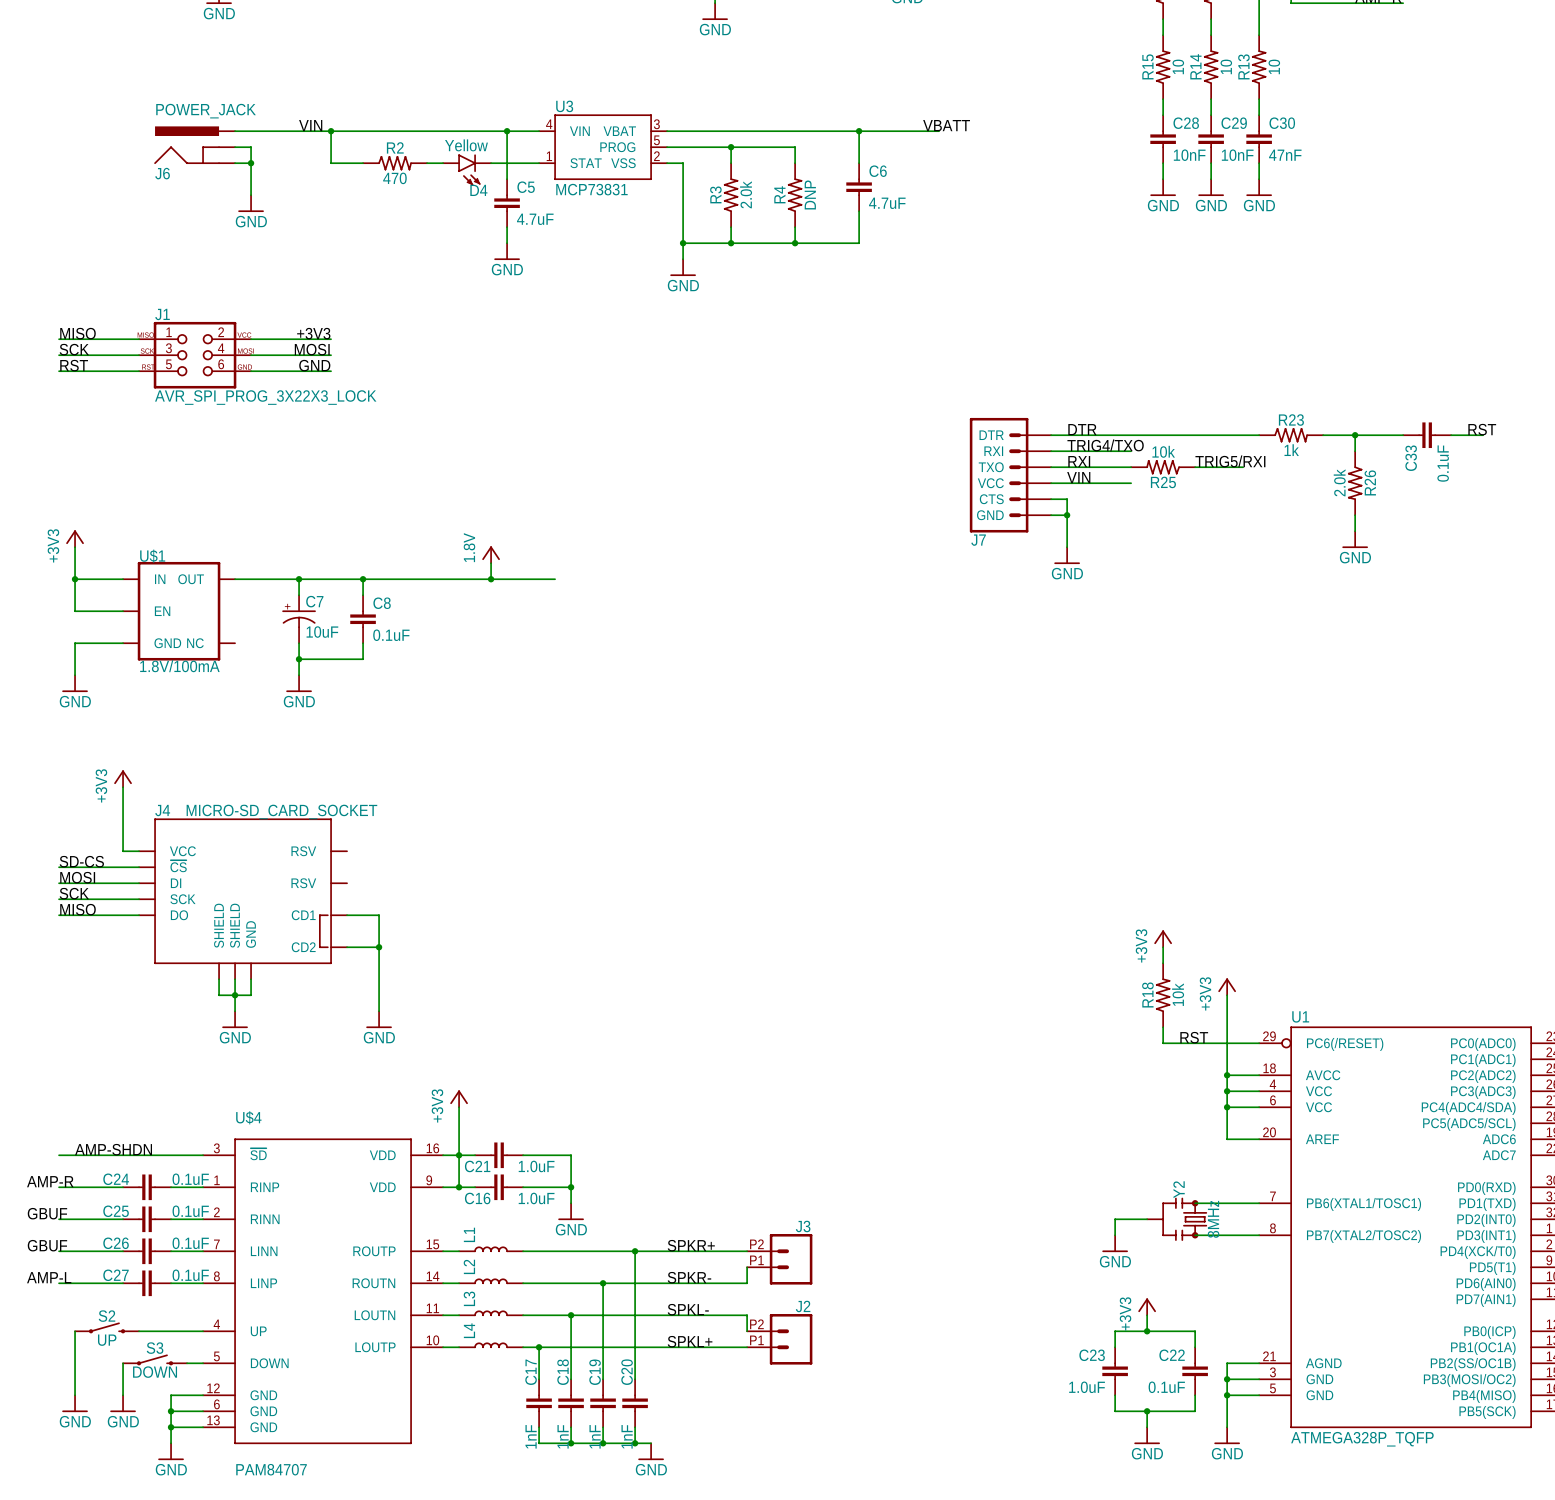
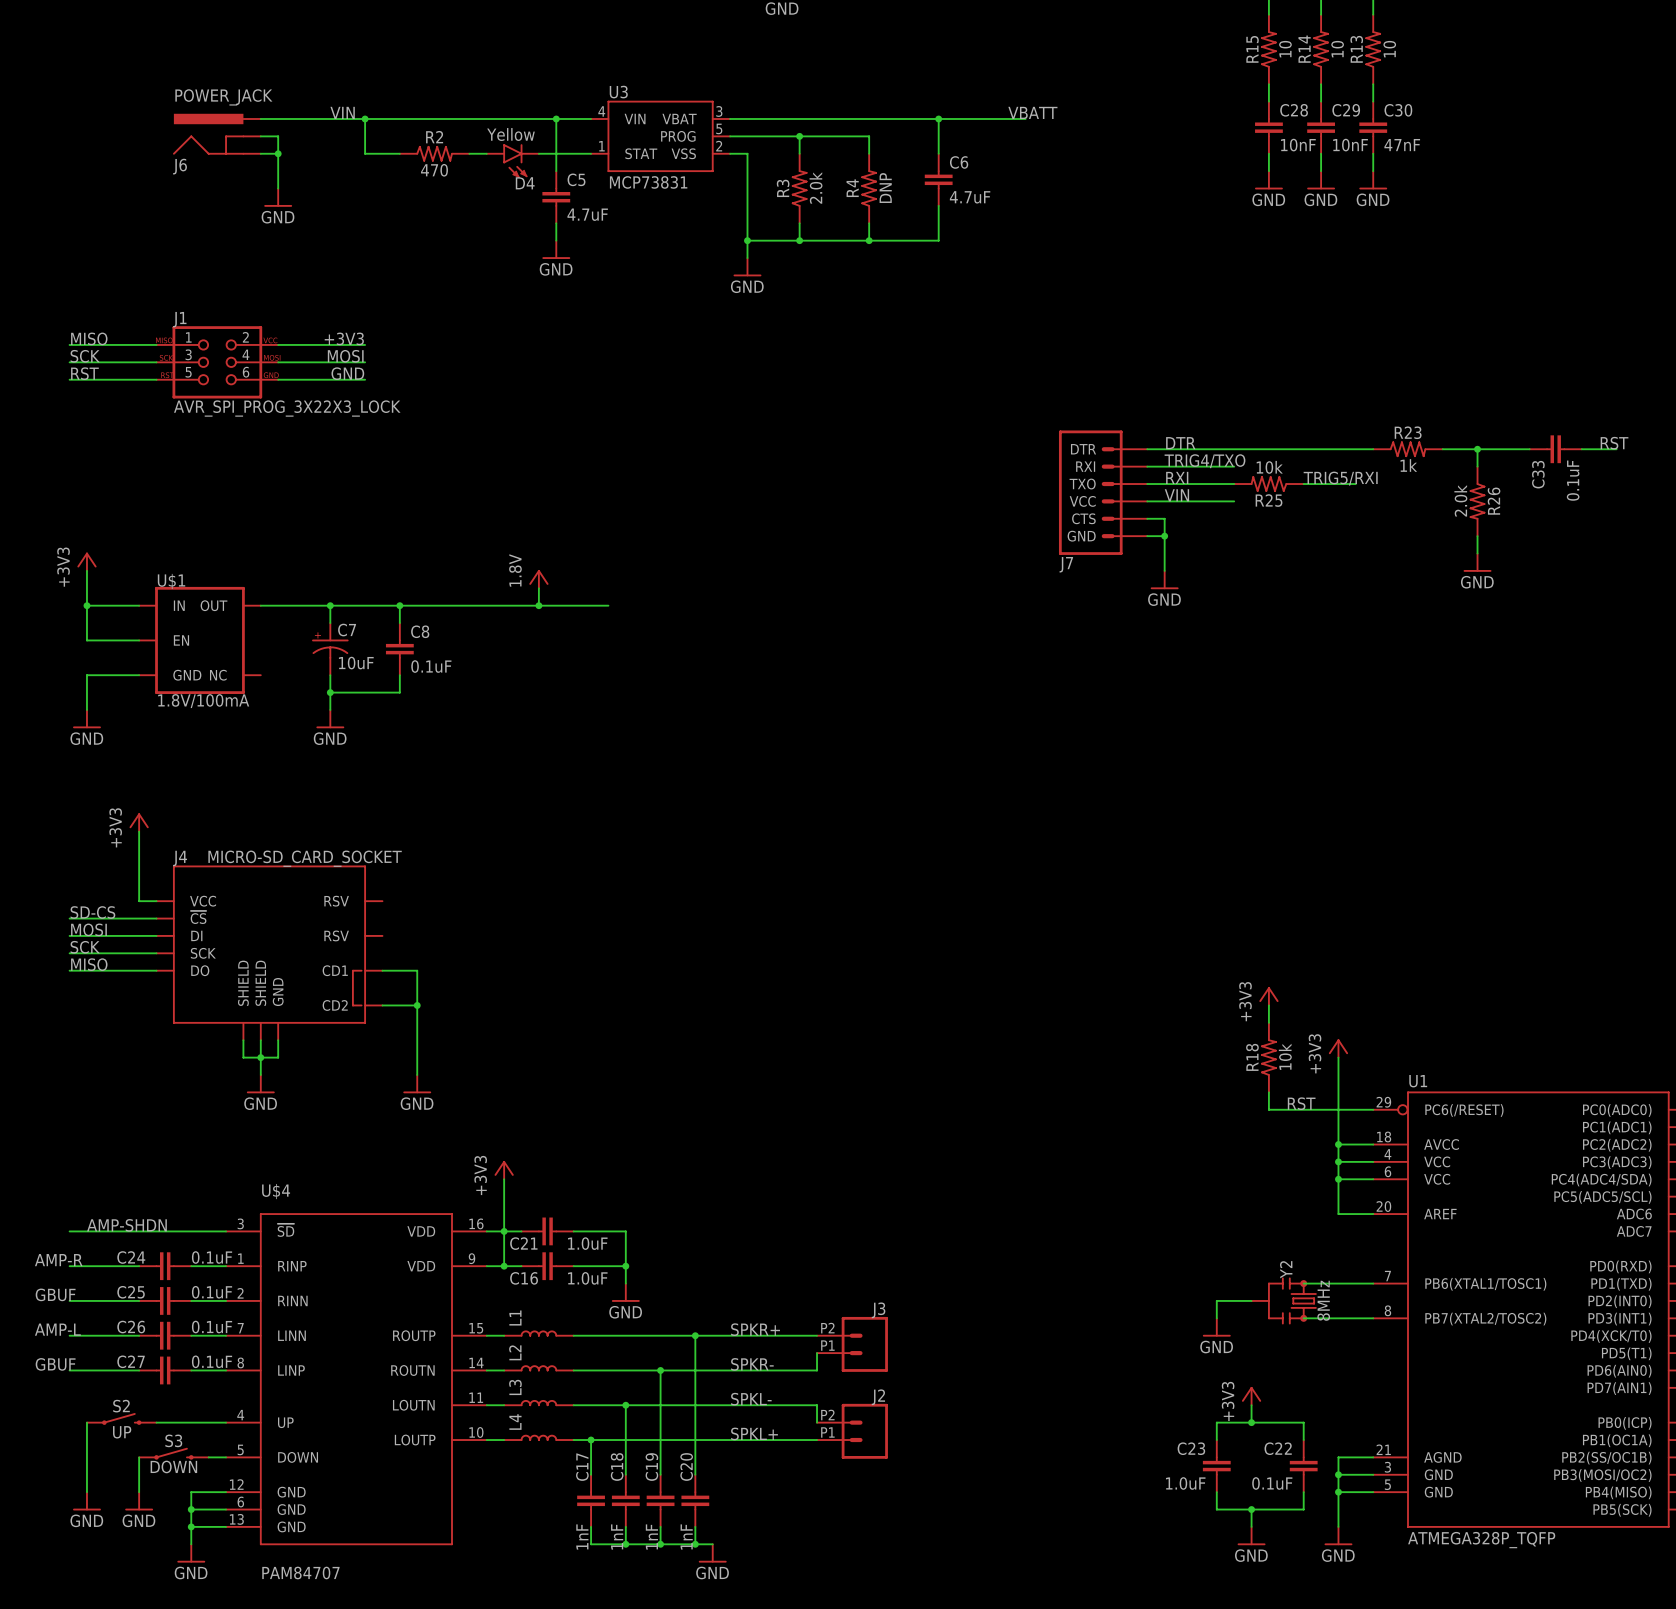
label: GBUF (47, 1245) -> AMP-L (57, 1329)
label: AMP-L (49, 1277) -> GBUF (55, 1364)

